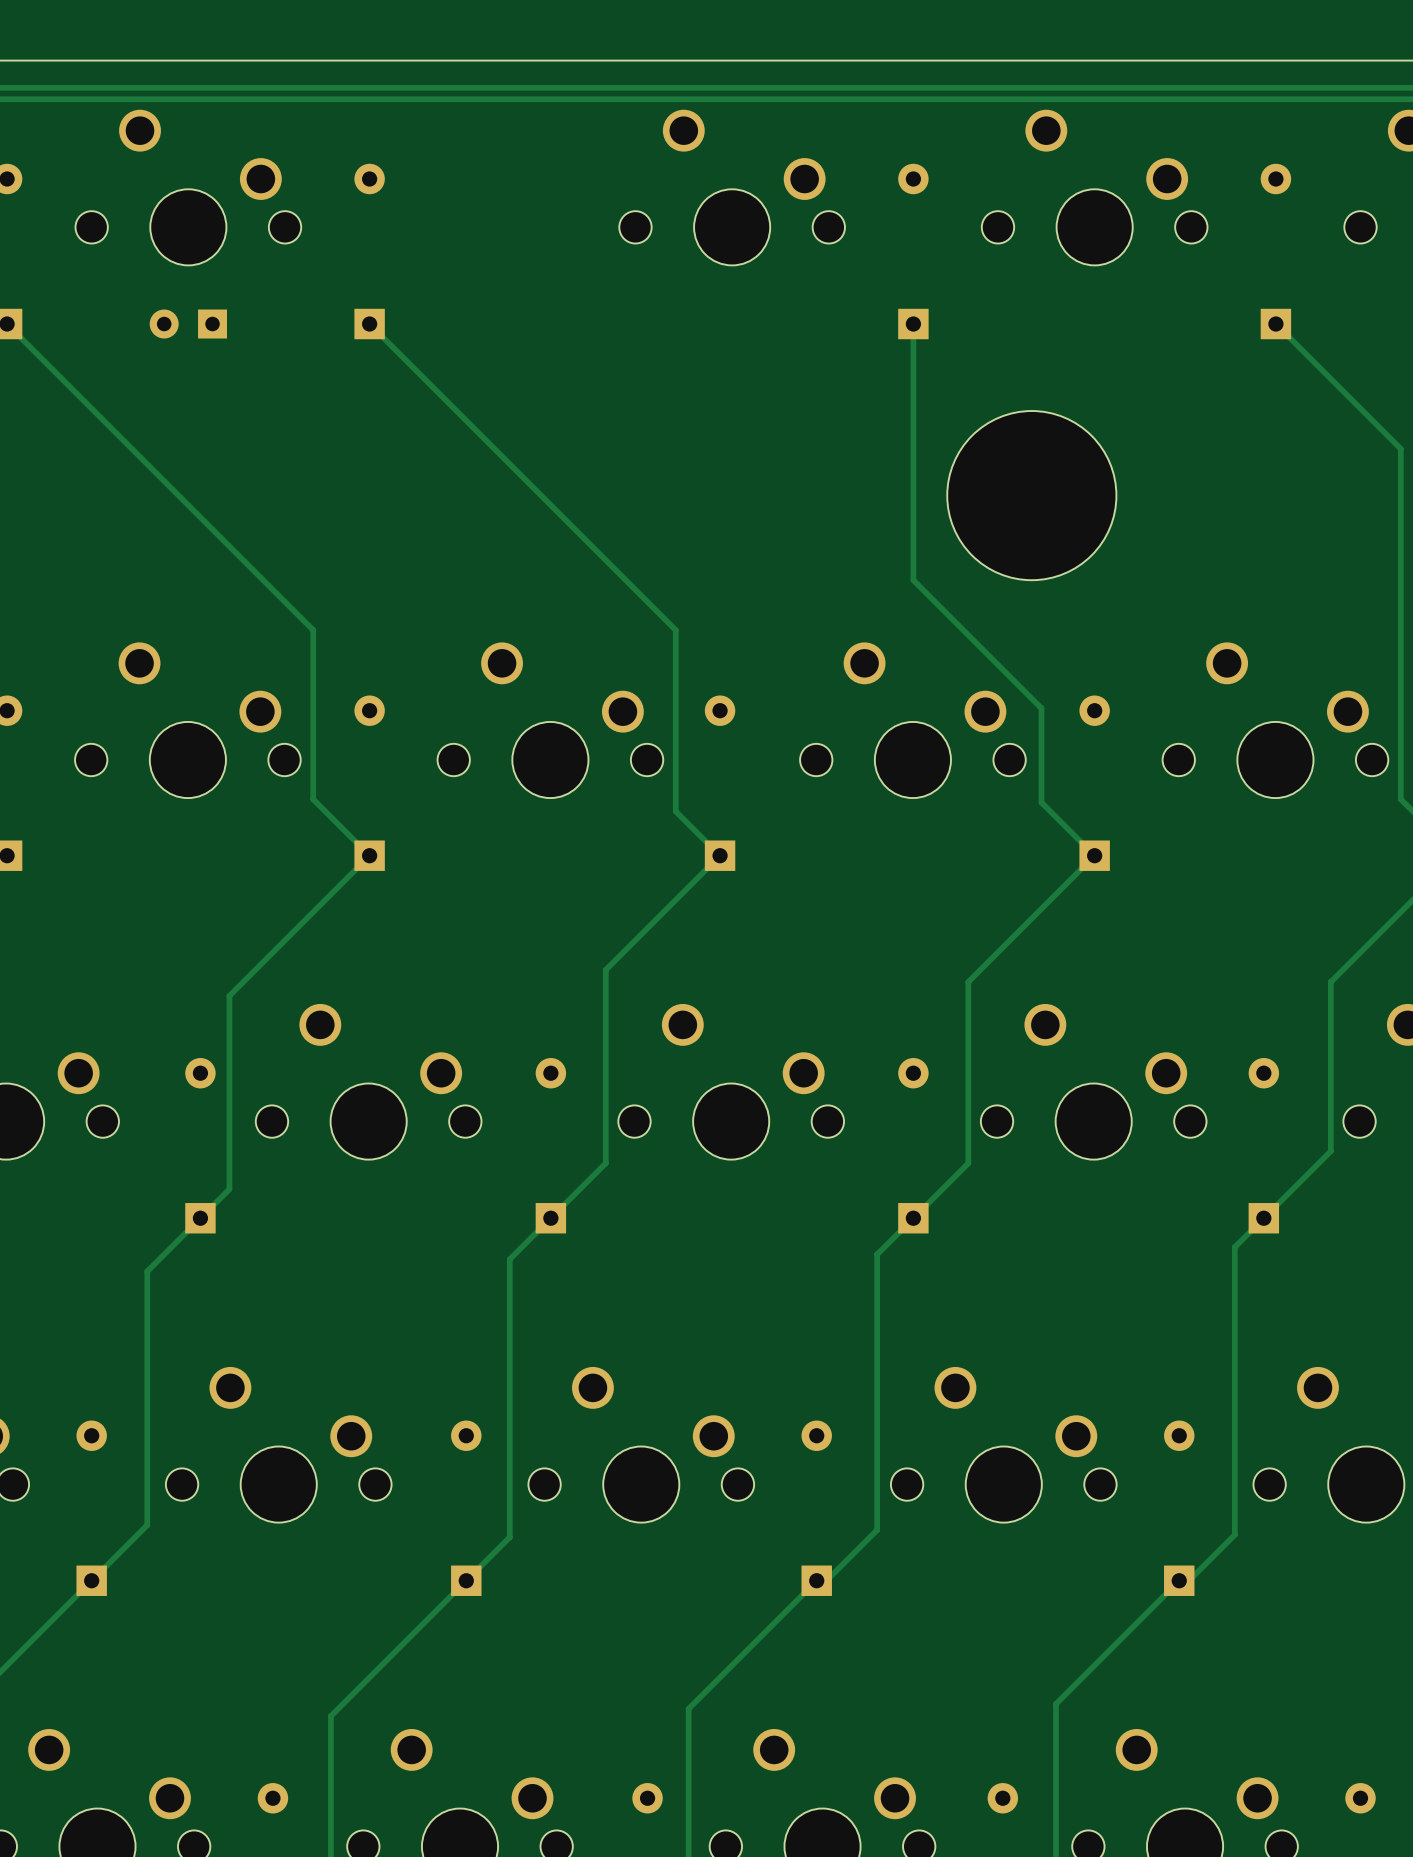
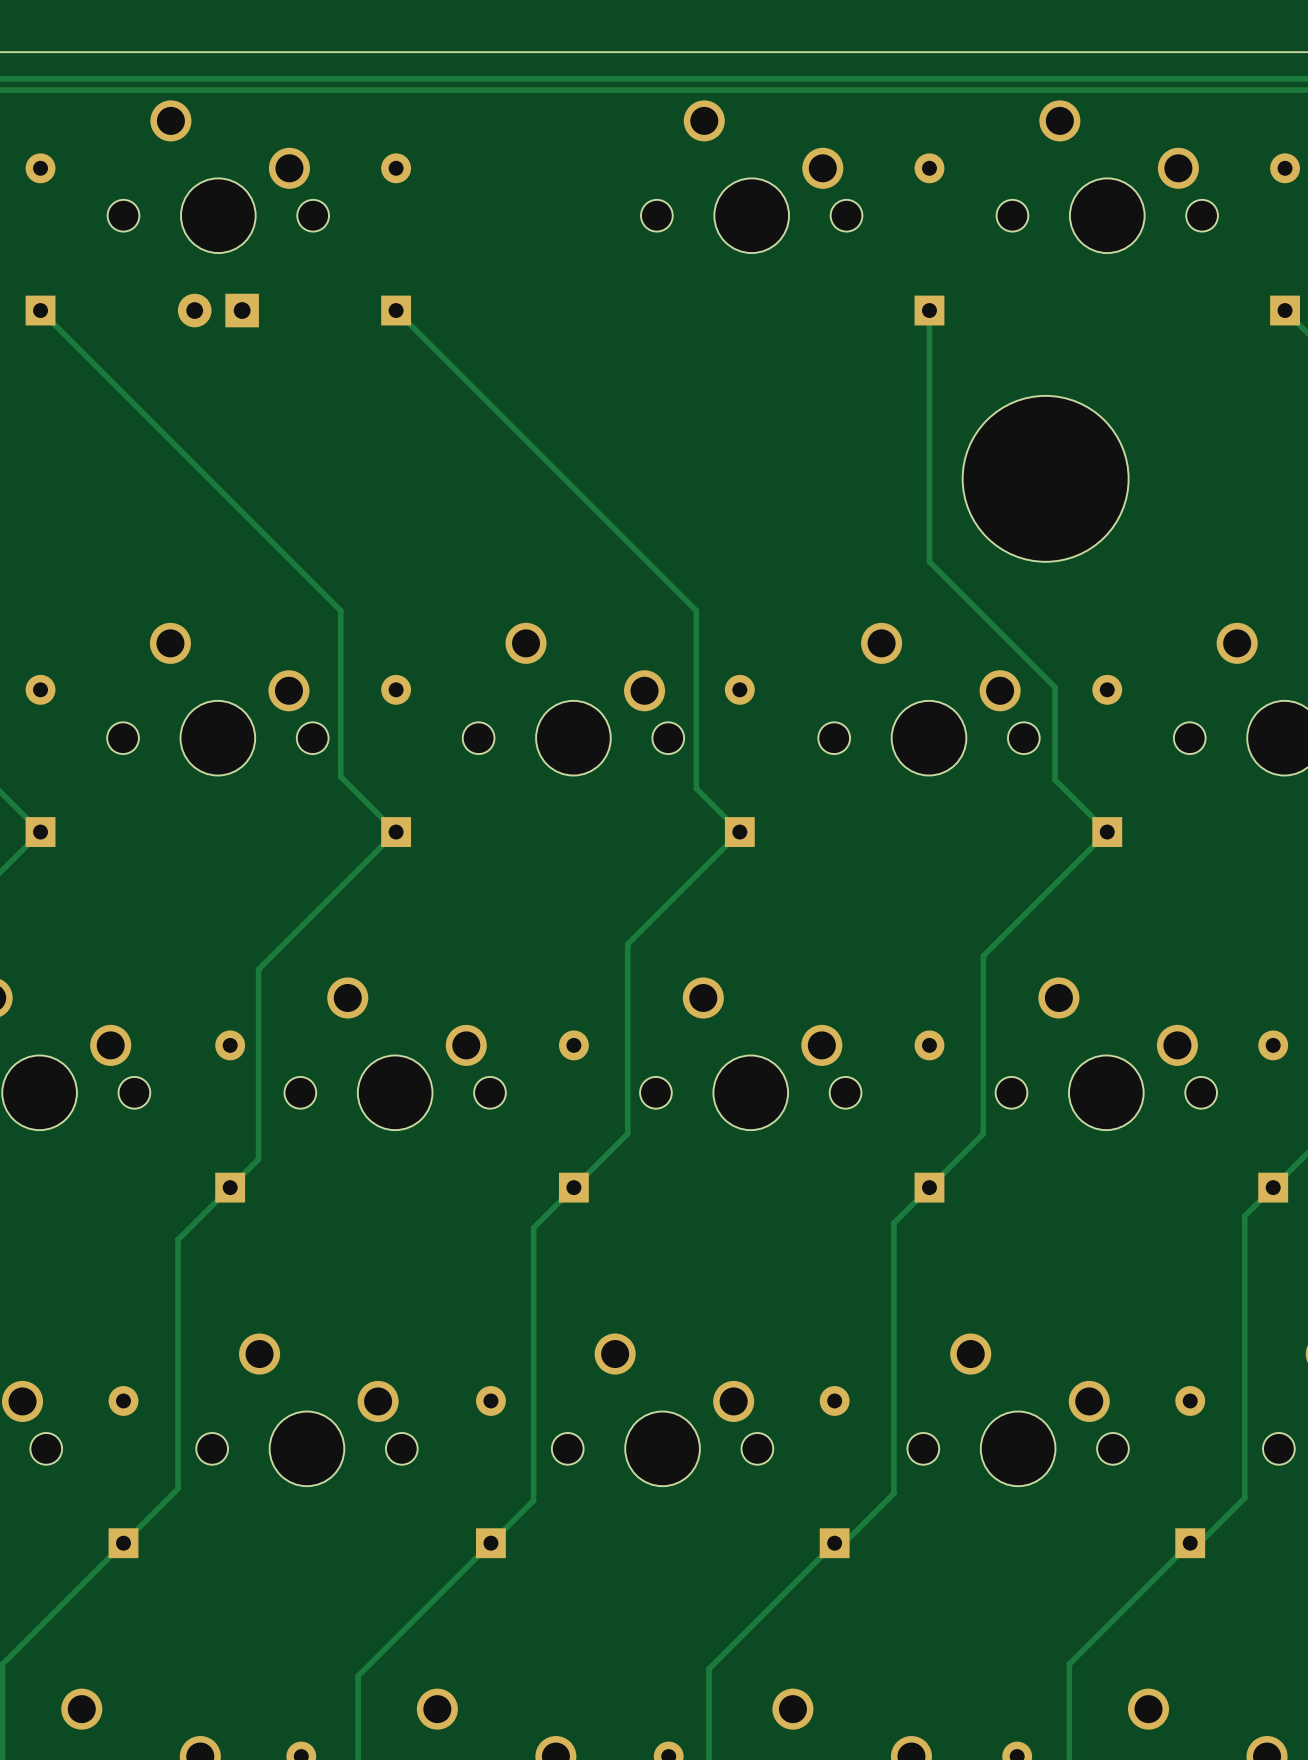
part: (188, 224) -> none
part: none -> (218, 310)

